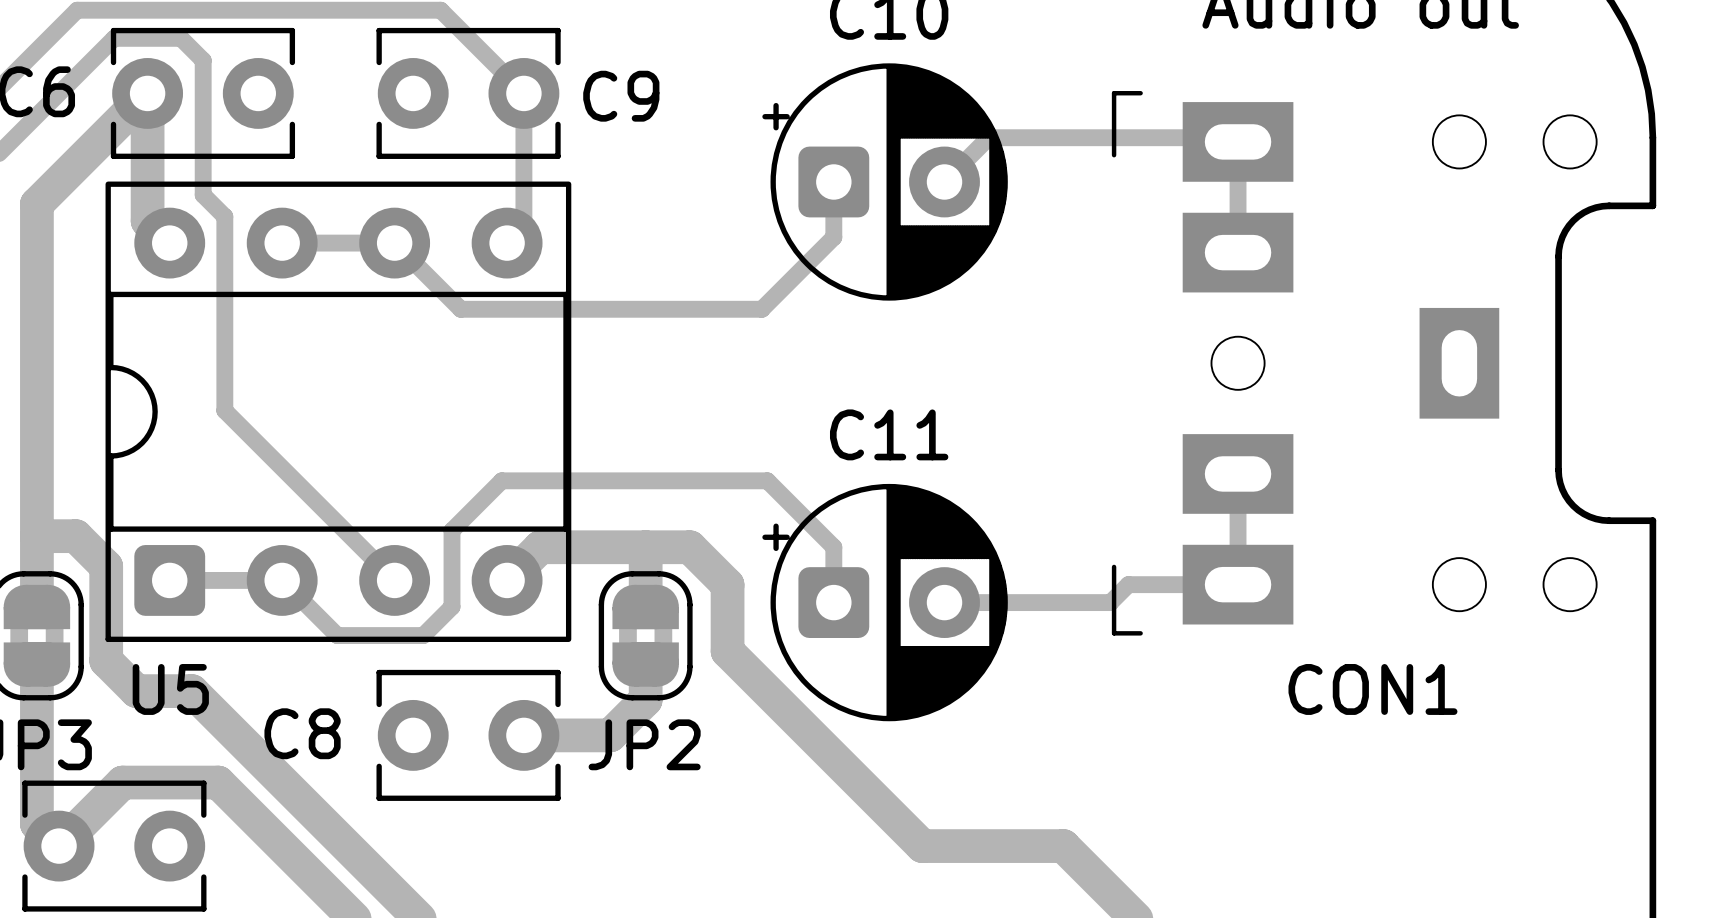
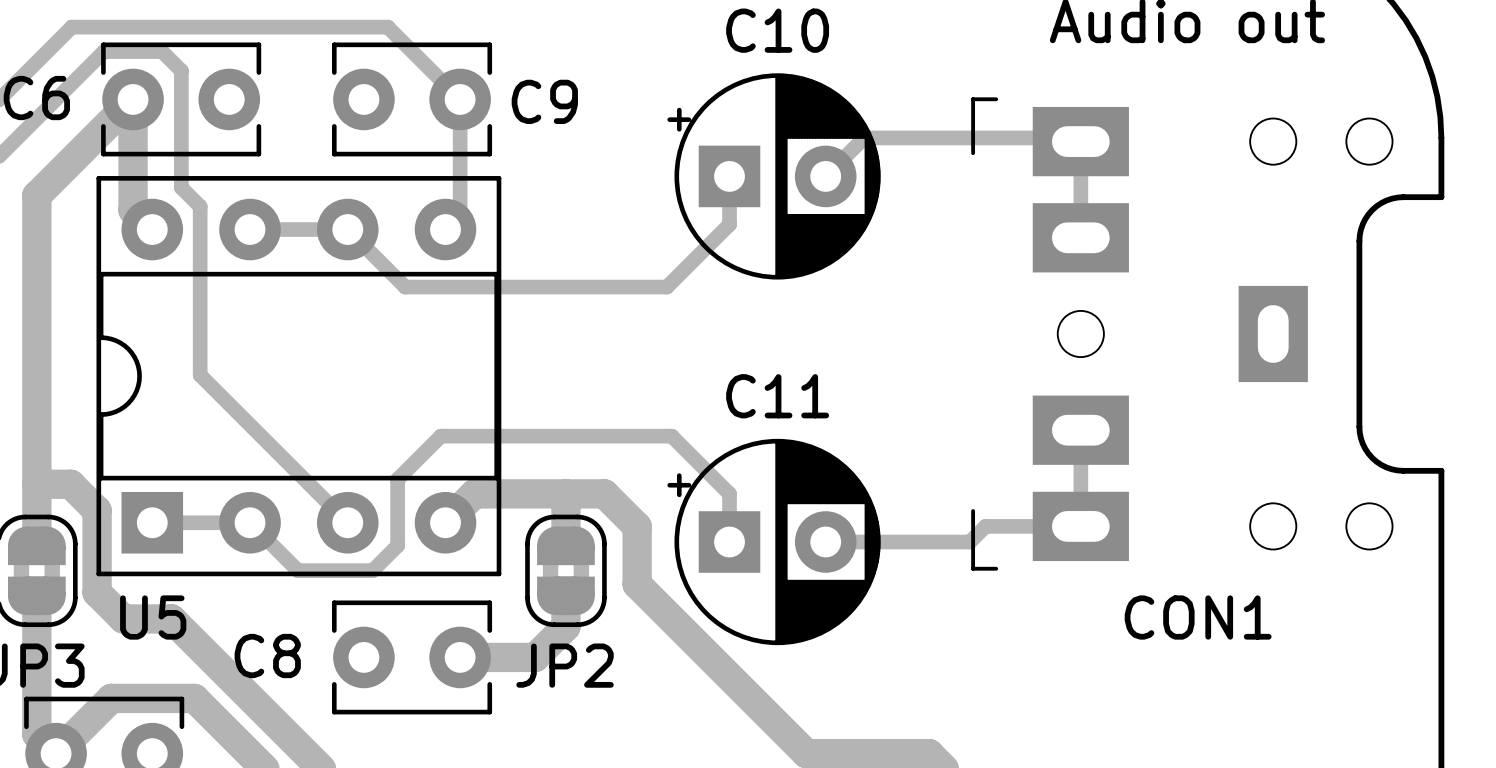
C10 footprint: [762, 63, 1008, 301] -> [667, 73, 881, 280]
U5 footprint: [105, 181, 572, 642] -> [96, 176, 502, 577]
C11 footprint: [762, 483, 1008, 722] -> [667, 438, 881, 646]

